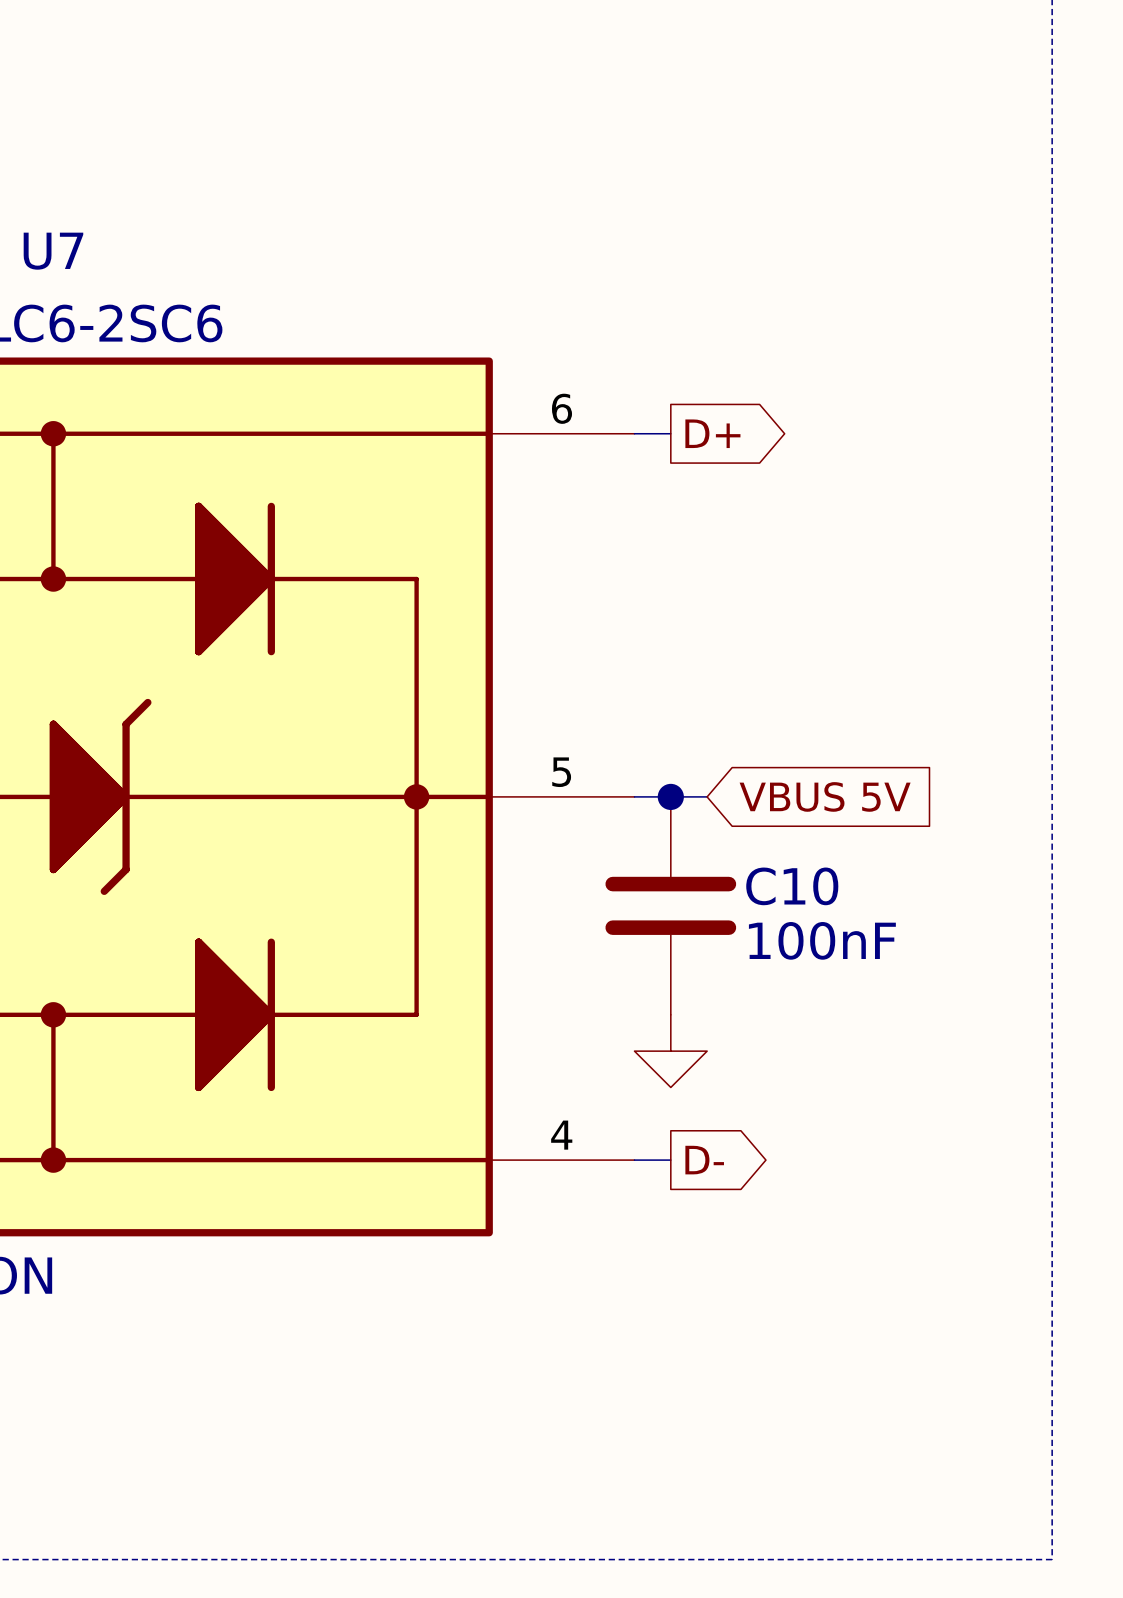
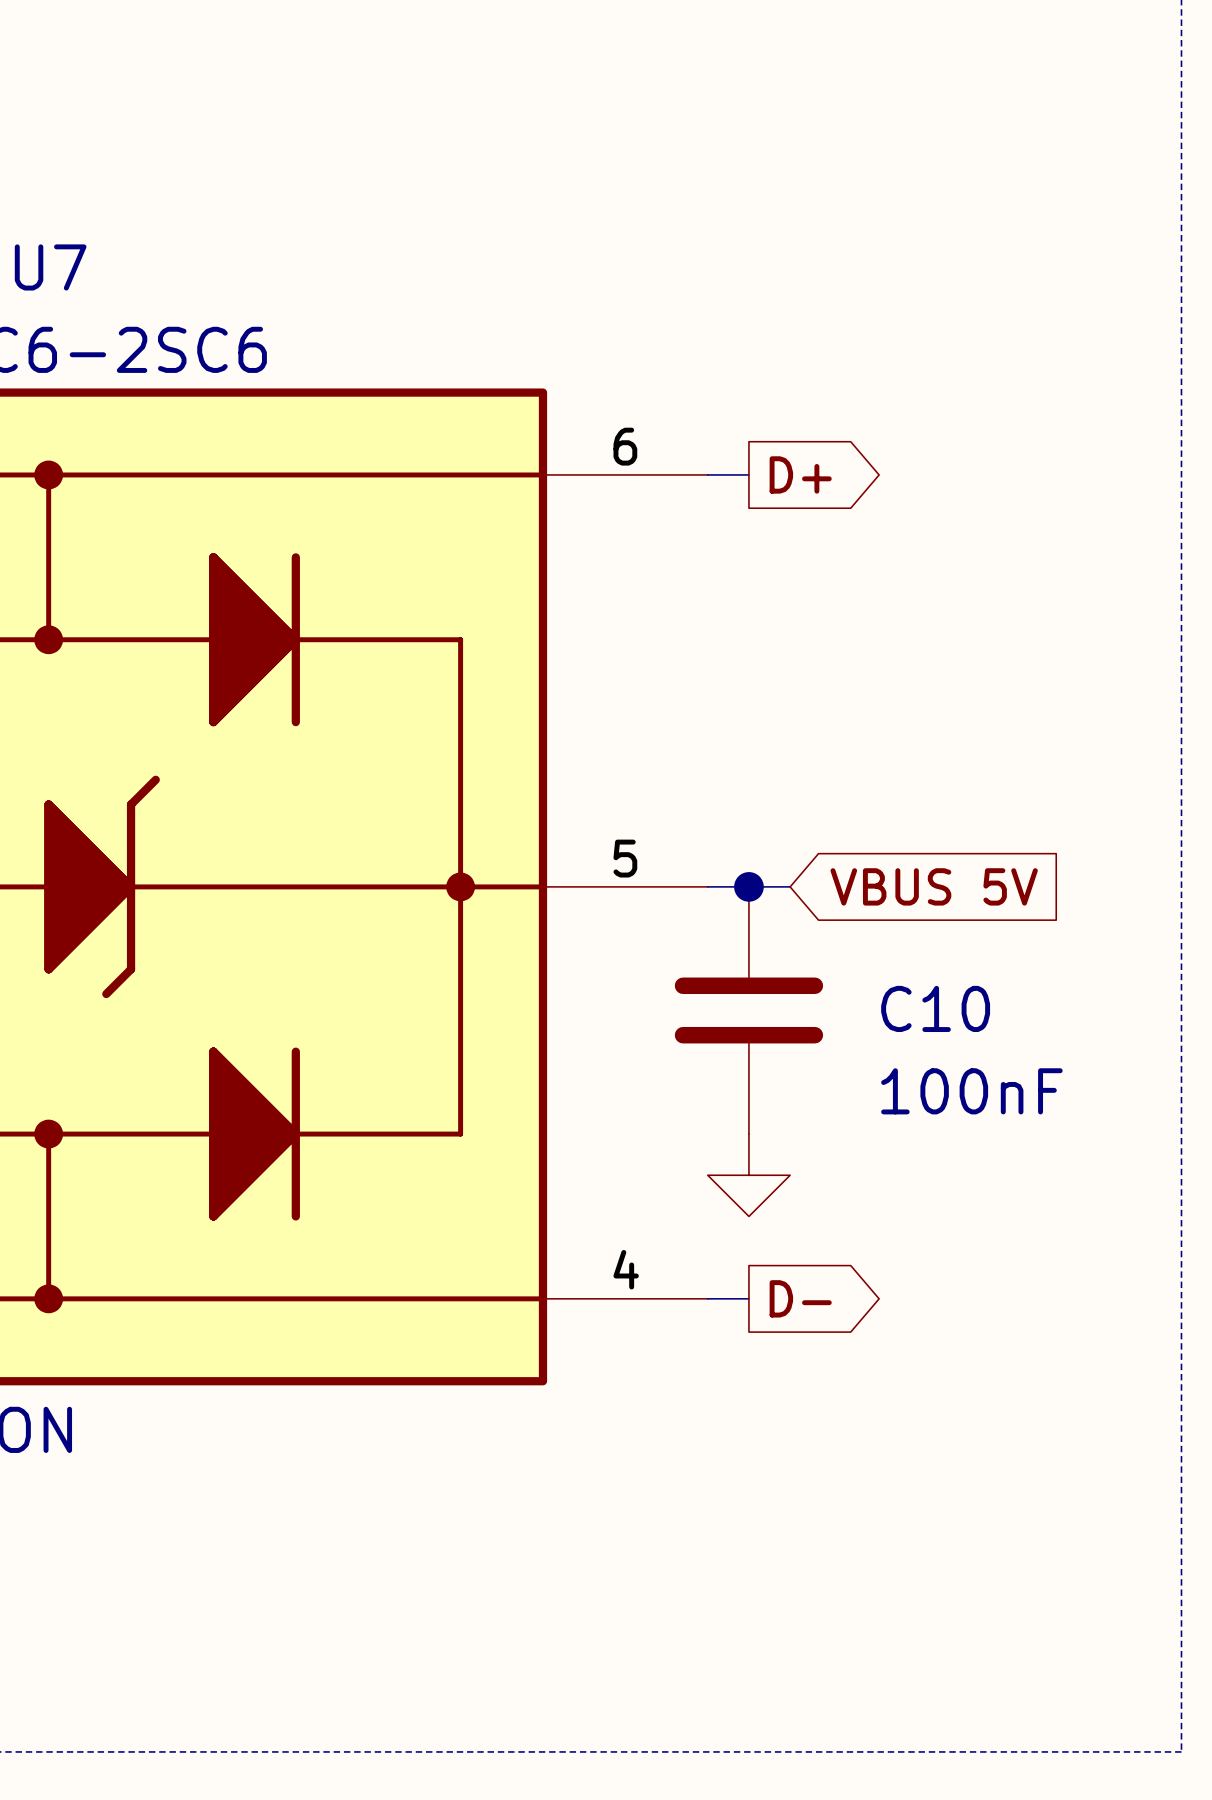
C10 name position: C10 (792, 886) -> C10 (935, 1008)
C10 value position: 100nF (822, 940) -> 100nF (971, 1091)

